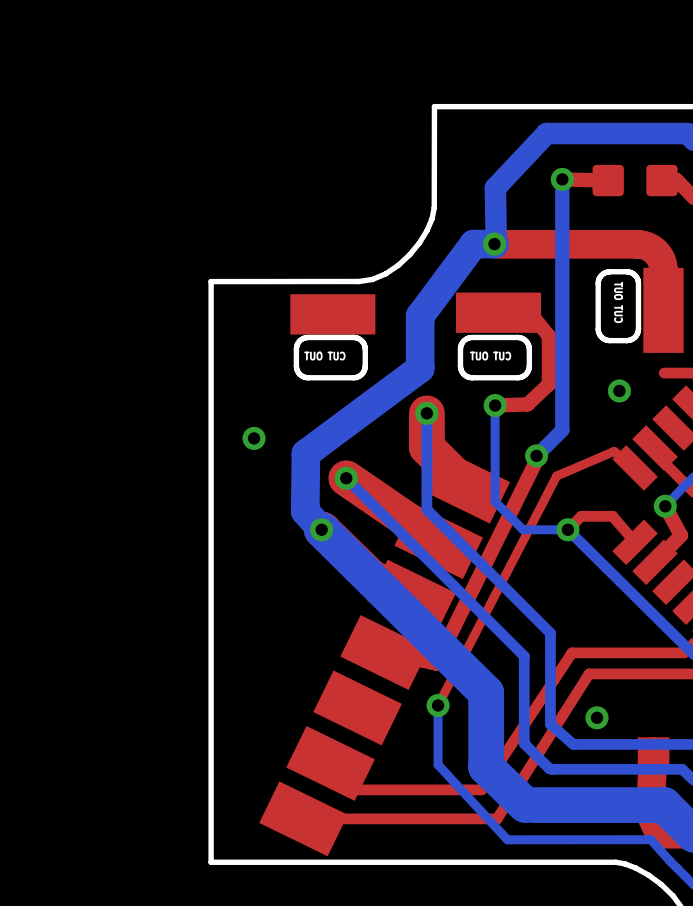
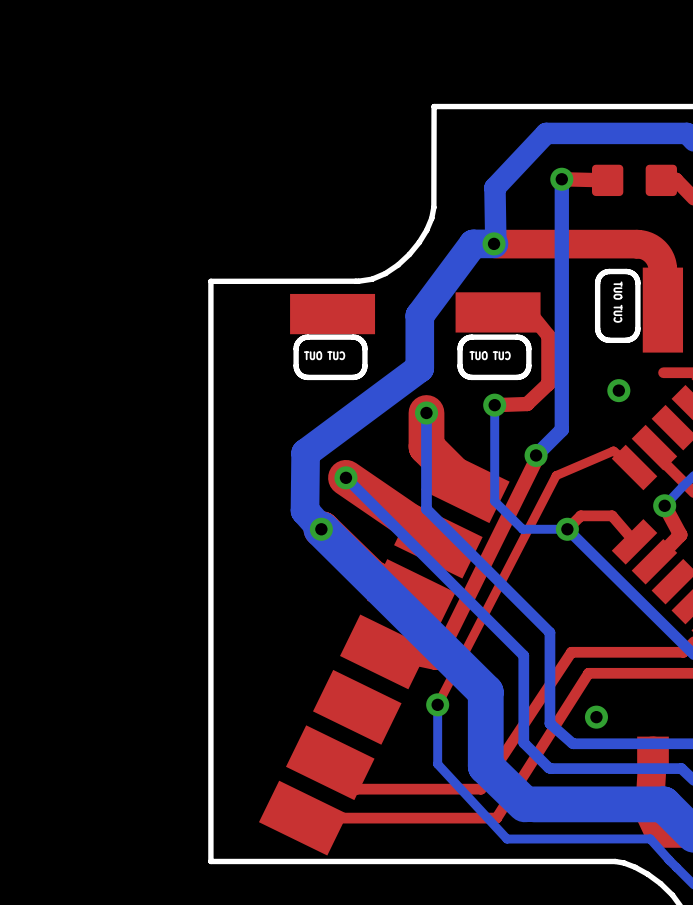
via: (254, 438) -> none

